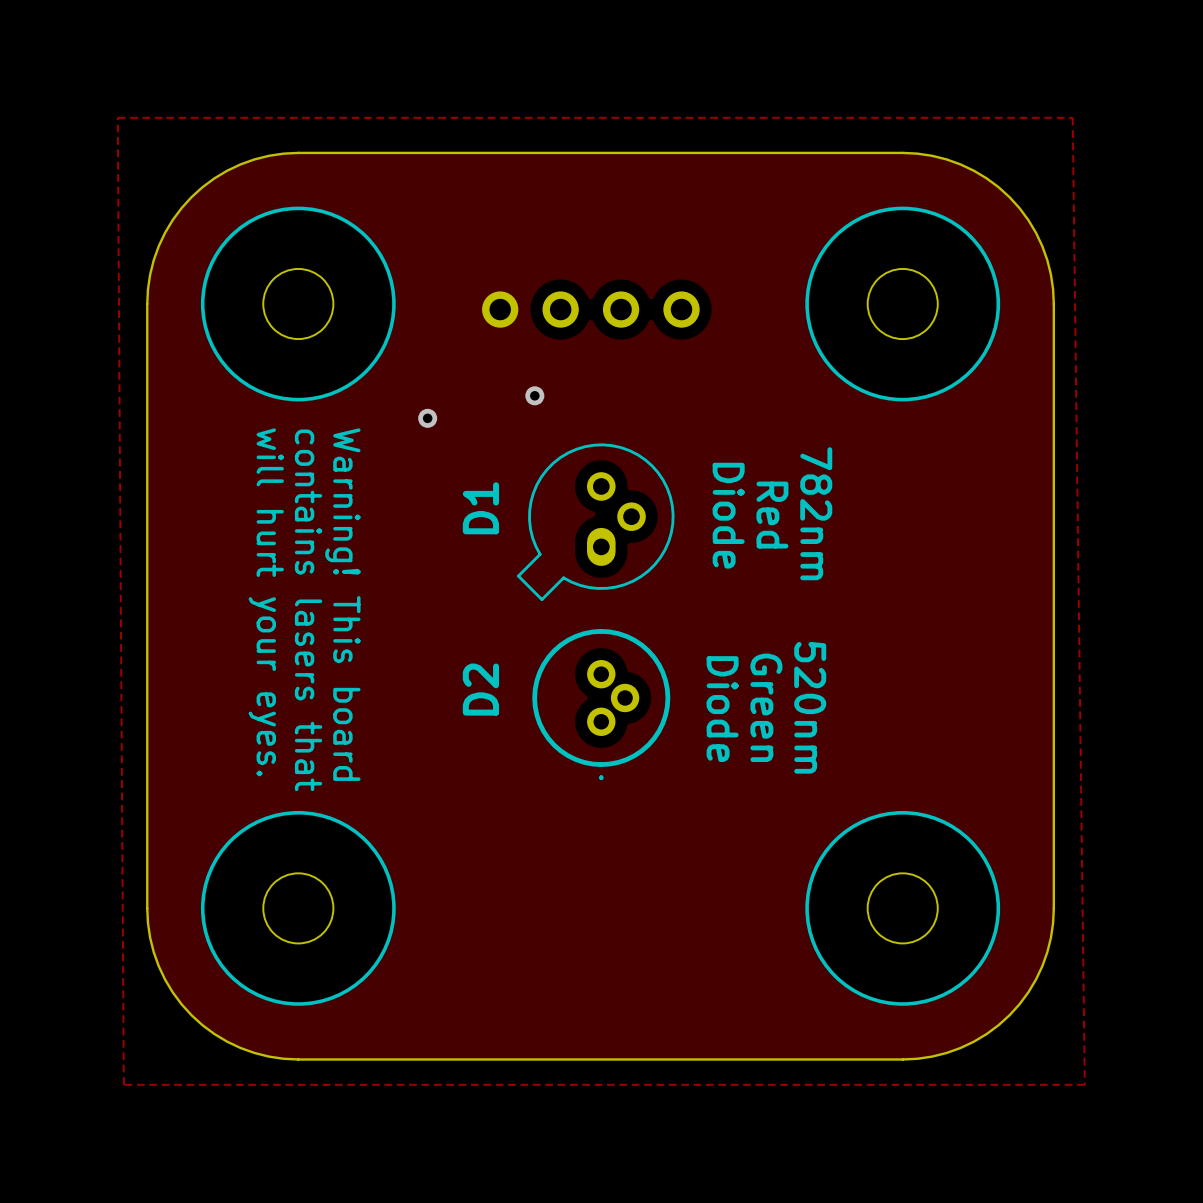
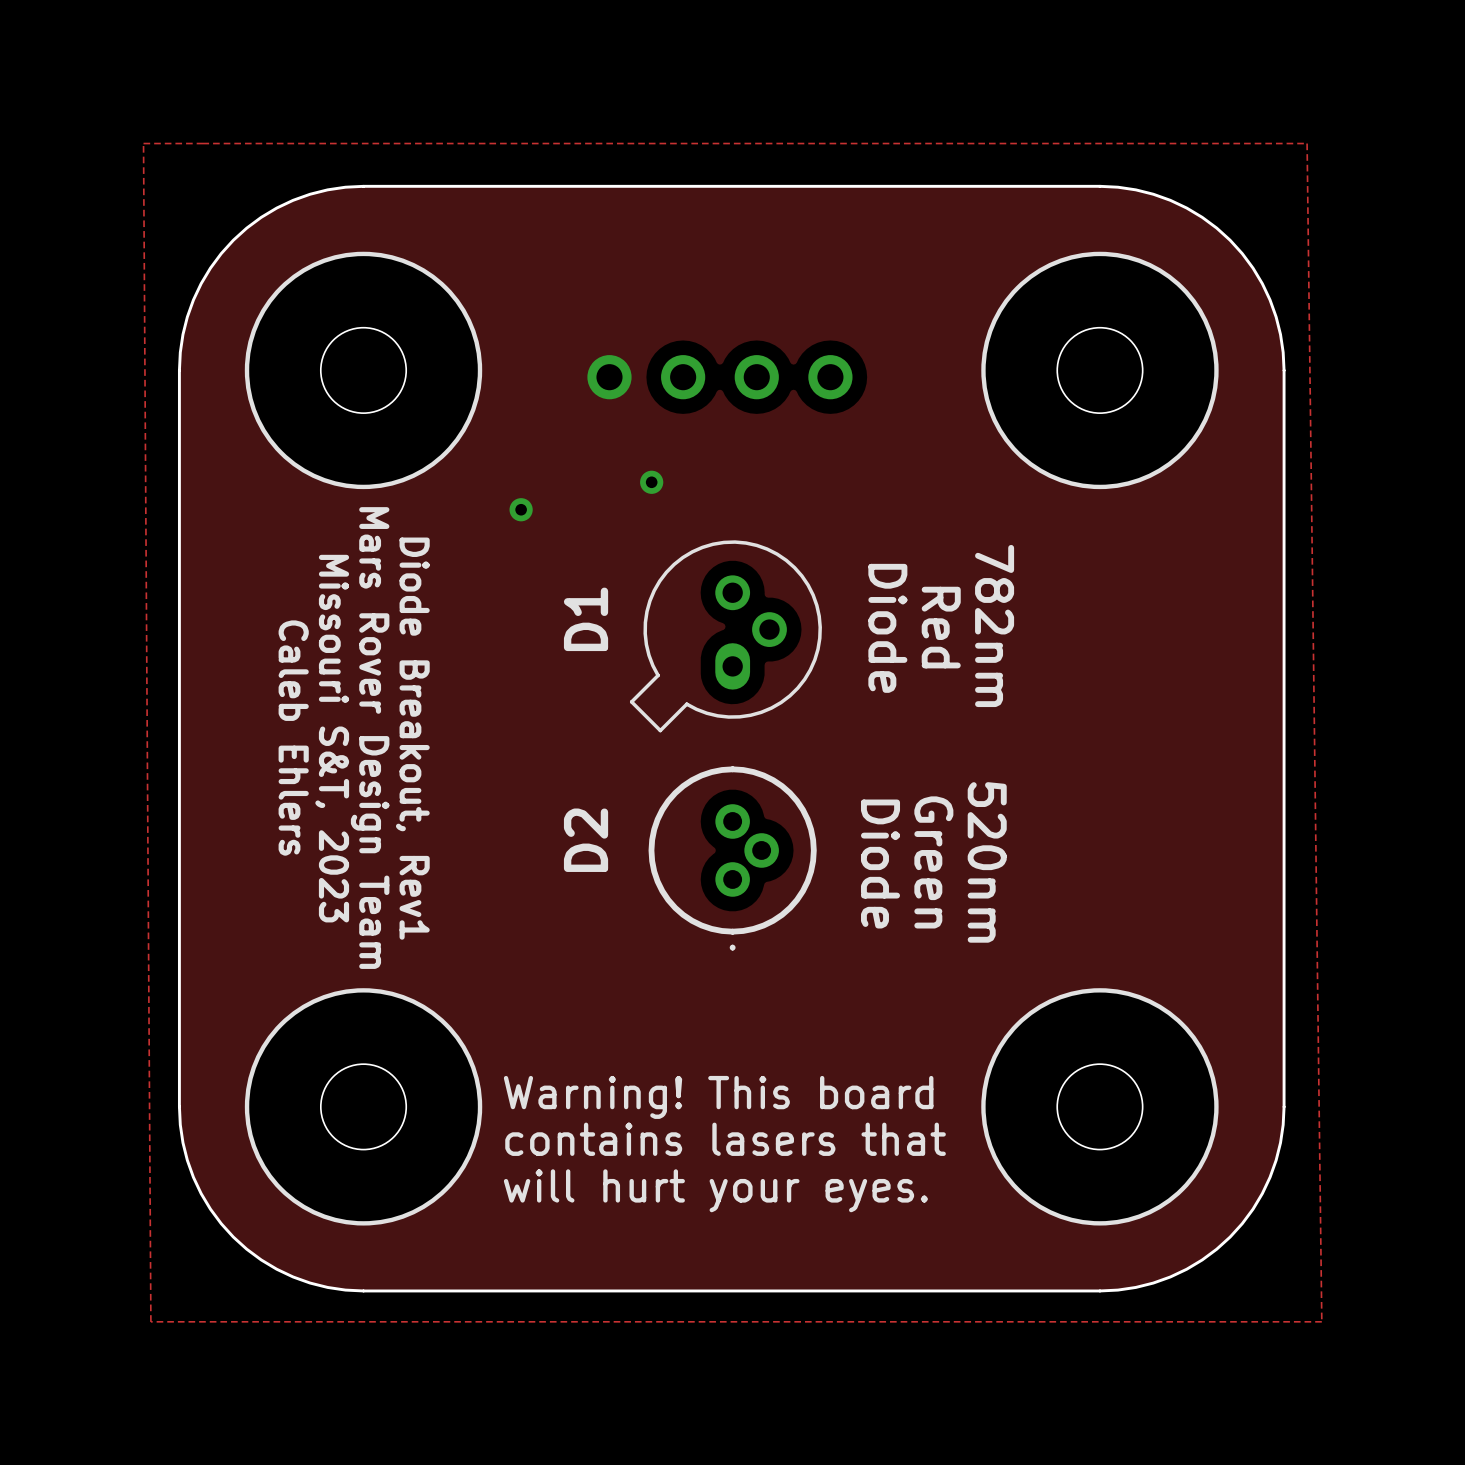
text rotation: 0° (266, 602) -> 90° counterclockwise (715, 1190)
text position: will hurt your eyes. (266, 602) -> will hurt your eyes. (715, 1190)
text rotation: 0° (342, 604) -> 90° counterclockwise (718, 1097)
text: none -> Caleb Ehlers (293, 738)
text: none -> Mars Rover Design Team (370, 738)
text: none -> Missouri S&T, 2023 (332, 738)
text: none -> Diode Breakout, Rev1 (412, 738)
text rotation: 0° (308, 610) -> 90° counterclockwise (725, 1139)

